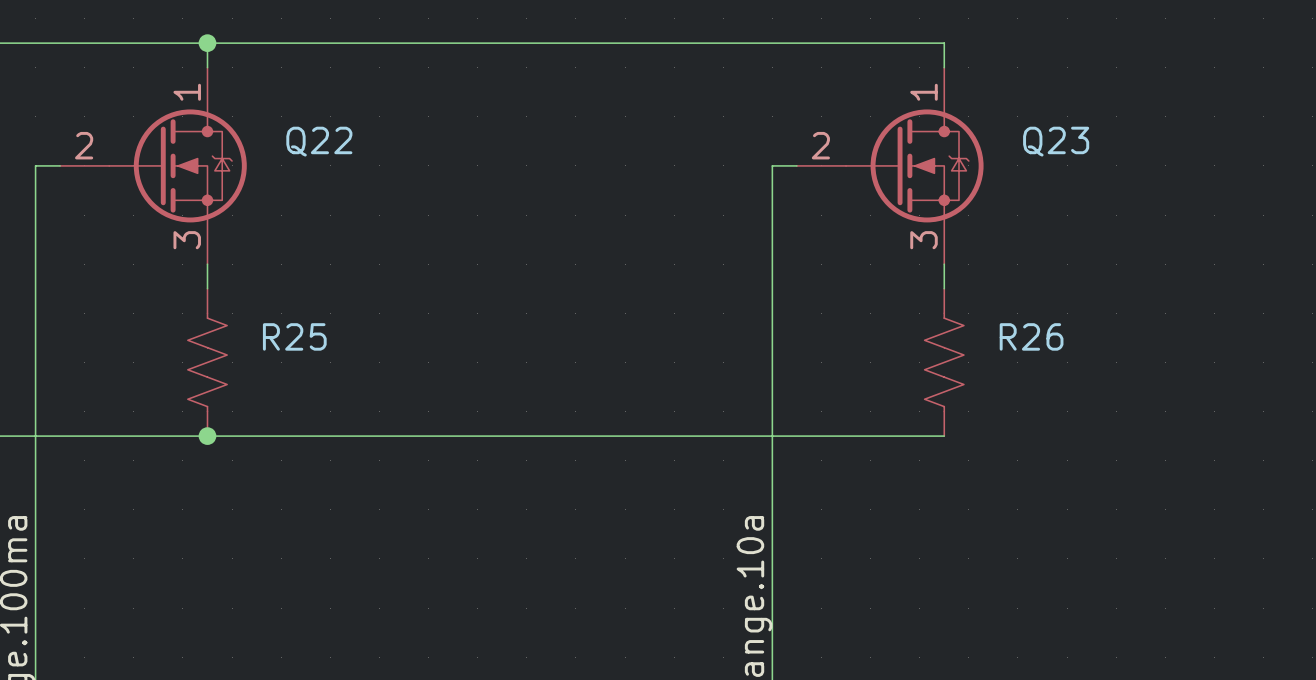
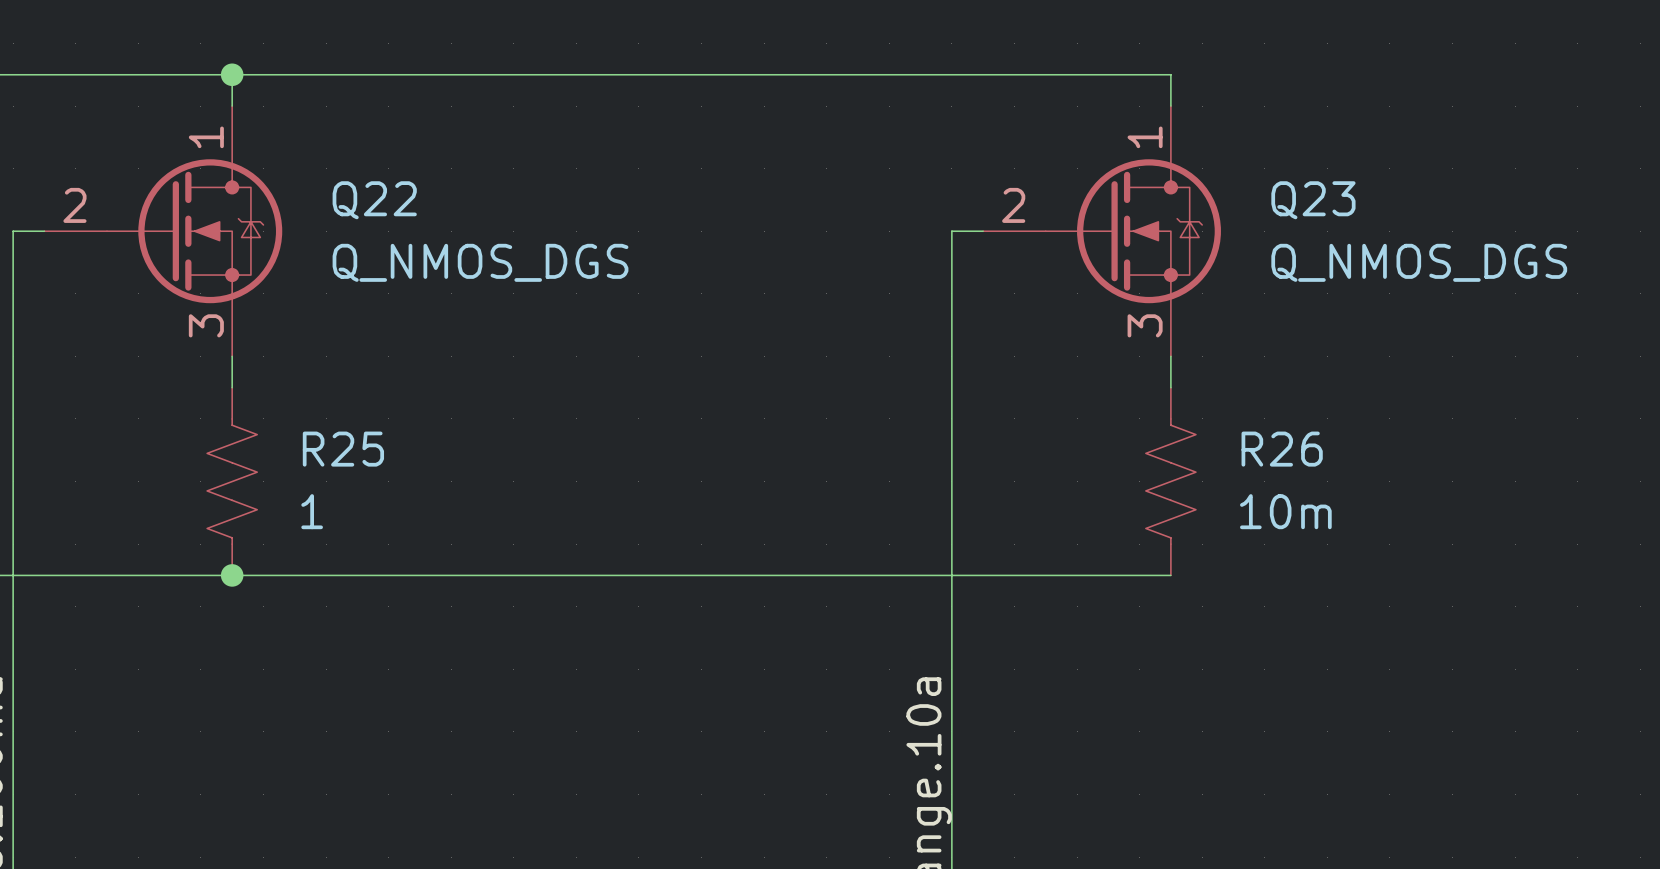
Q22 value: none -> Q_NMOS_DGS (480, 262)
Q23 value: none -> Q_NMOS_DGS (1419, 262)
R25 value: none -> 1 (312, 511)
R26 value: none -> 10m (1285, 511)

